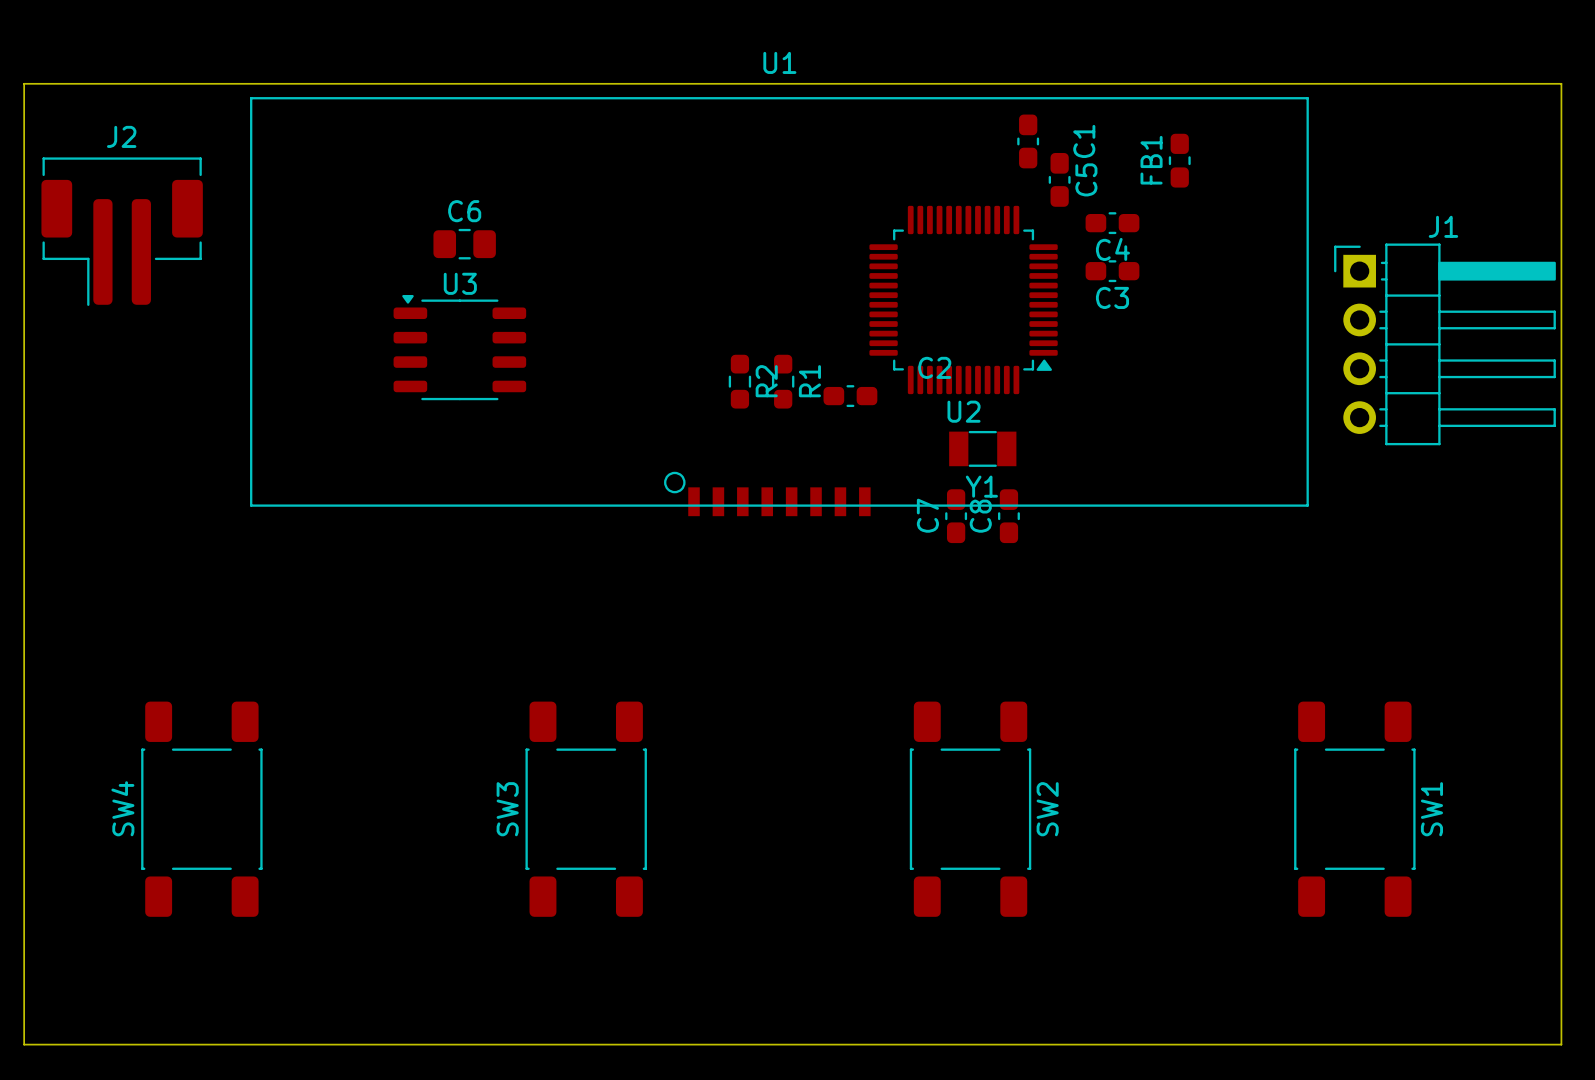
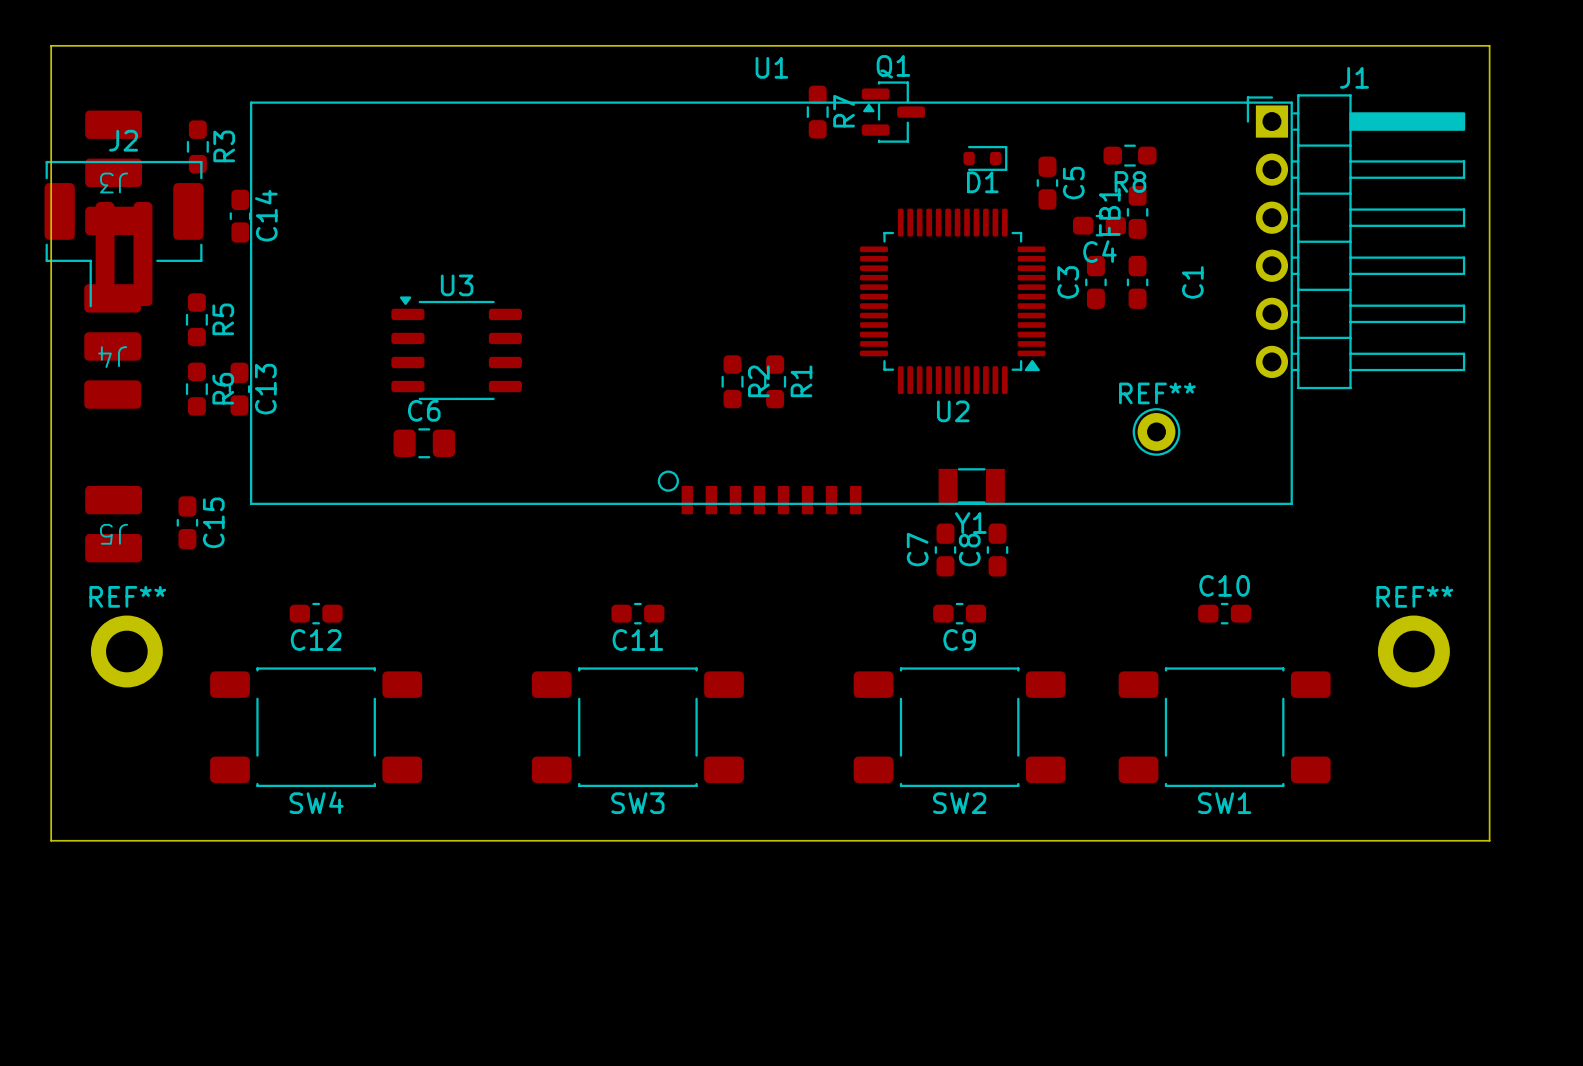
board edge: (24, 83) (1561, 83) (1561, 1044) (24, 1044) (24, 83) -> (51, 45) (51, 840) (1489, 840) (1489, 45) (51, 45)
R7: none -> (817, 112)
Q1: none -> (893, 112)
C1 position: (1028, 141) -> (1137, 282)
R3: none -> (197, 146)
R8: none -> (1130, 155)
D1: none -> (985, 158)
FB1 position: (1179, 160) -> (1137, 212)
J3: none -> (113, 172)
C14: none -> (240, 216)
J1 name position: J1 (1443, 226) -> J1 (1354, 77)
J1 footprint: [1334, 243, 1556, 446] -> [1246, 94, 1466, 390]
C6 position: (464, 244) -> (424, 443)
C3 rotation: 0° (1112, 271) -> 90° clockwise (1095, 282)
R5: none -> (196, 319)
J4: none -> (112, 346)
R6: none -> (196, 389)
C13: none -> (239, 389)
C2: (850, 396) -> none
REF**: none -> (1156, 431)
Y1 position: (982, 448) -> (971, 485)
C7 position: (956, 516) -> (945, 550)
C8 position: (1008, 516) -> (997, 550)
C15: none -> (187, 522)
J5: none -> (113, 524)
C12: none -> (316, 613)
C11: none -> (637, 613)
C9: none -> (959, 613)
C10: none -> (1224, 613)
REF**: none -> (126, 651)
REF**: none -> (1413, 651)
SW4 name position: SW4 (122, 808) -> SW4 (316, 802)
SW4 rotation: 0° (201, 809) -> 90° clockwise (316, 727)
SW4 position: (201, 809) -> (316, 727)
SW3 name position: SW3 (507, 809) -> SW3 (637, 803)
SW3 rotation: 0° (586, 809) -> 90° clockwise (637, 727)
SW2 rotation: 0° (970, 809) -> 90° clockwise (959, 727)
SW1 rotation: 0° (1354, 809) -> 90° clockwise (1224, 727)
SW1 position: (1354, 809) -> (1224, 727)

